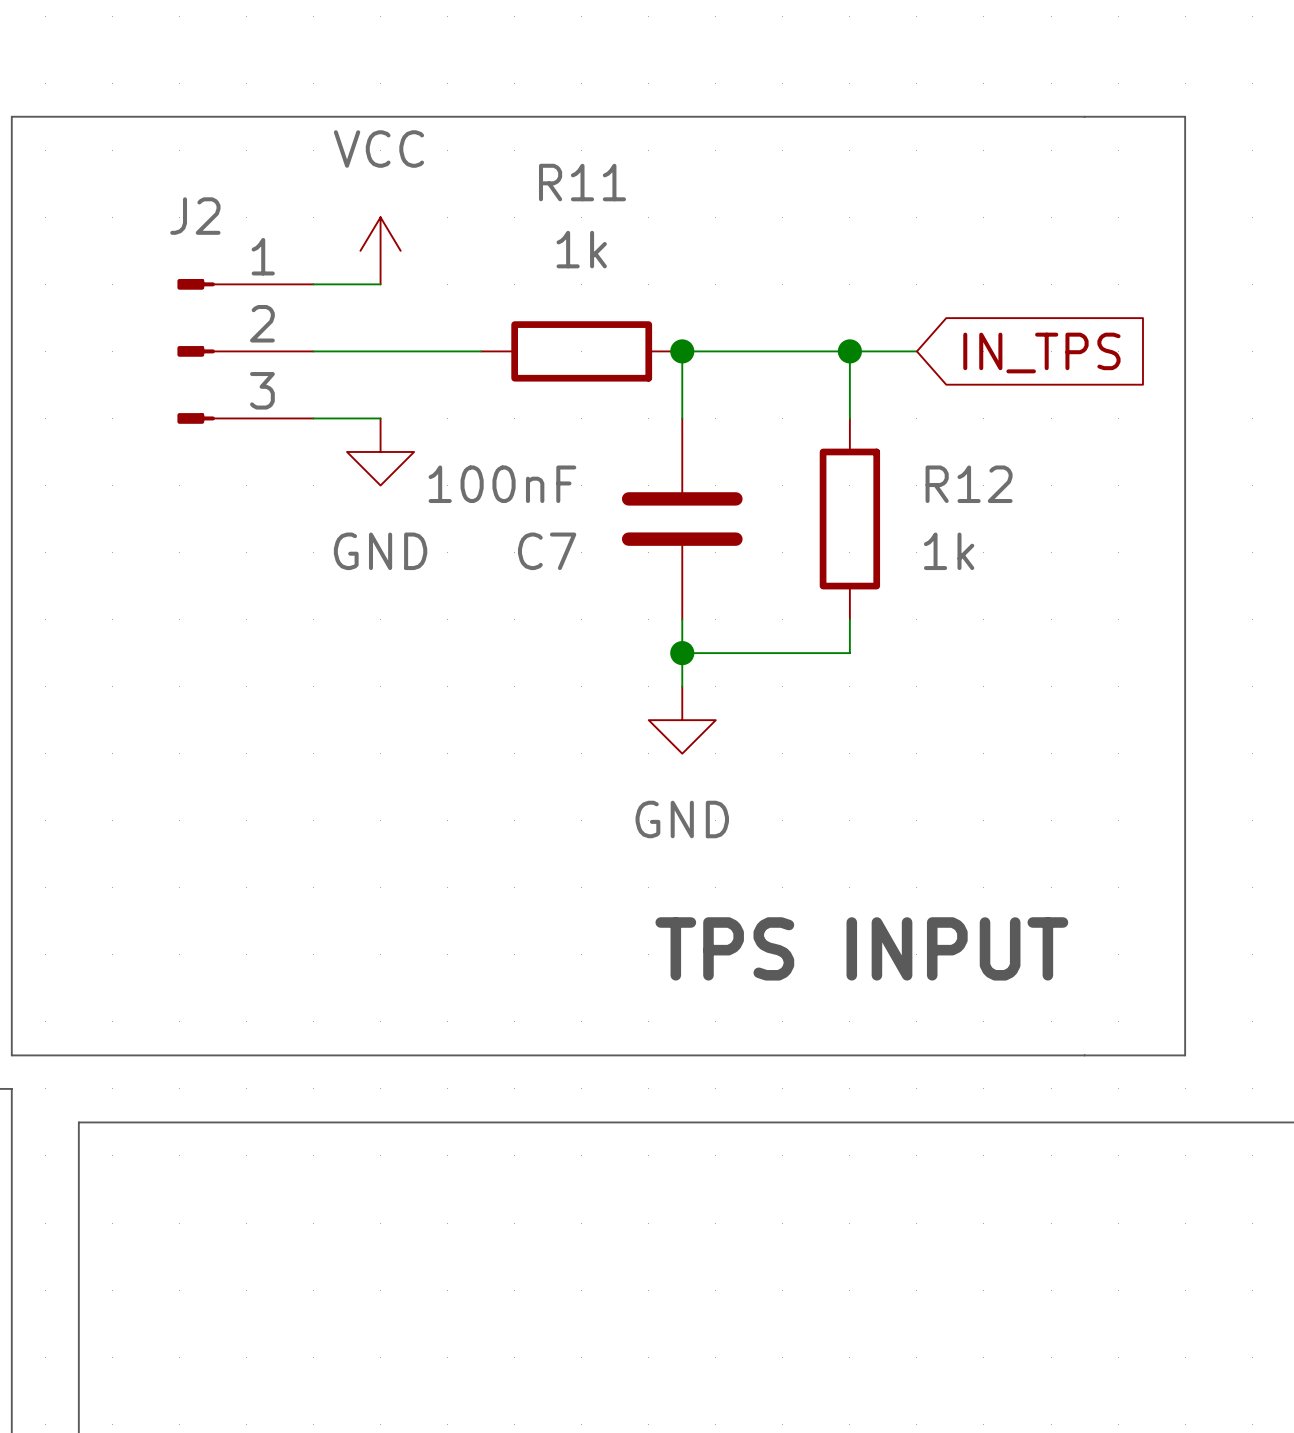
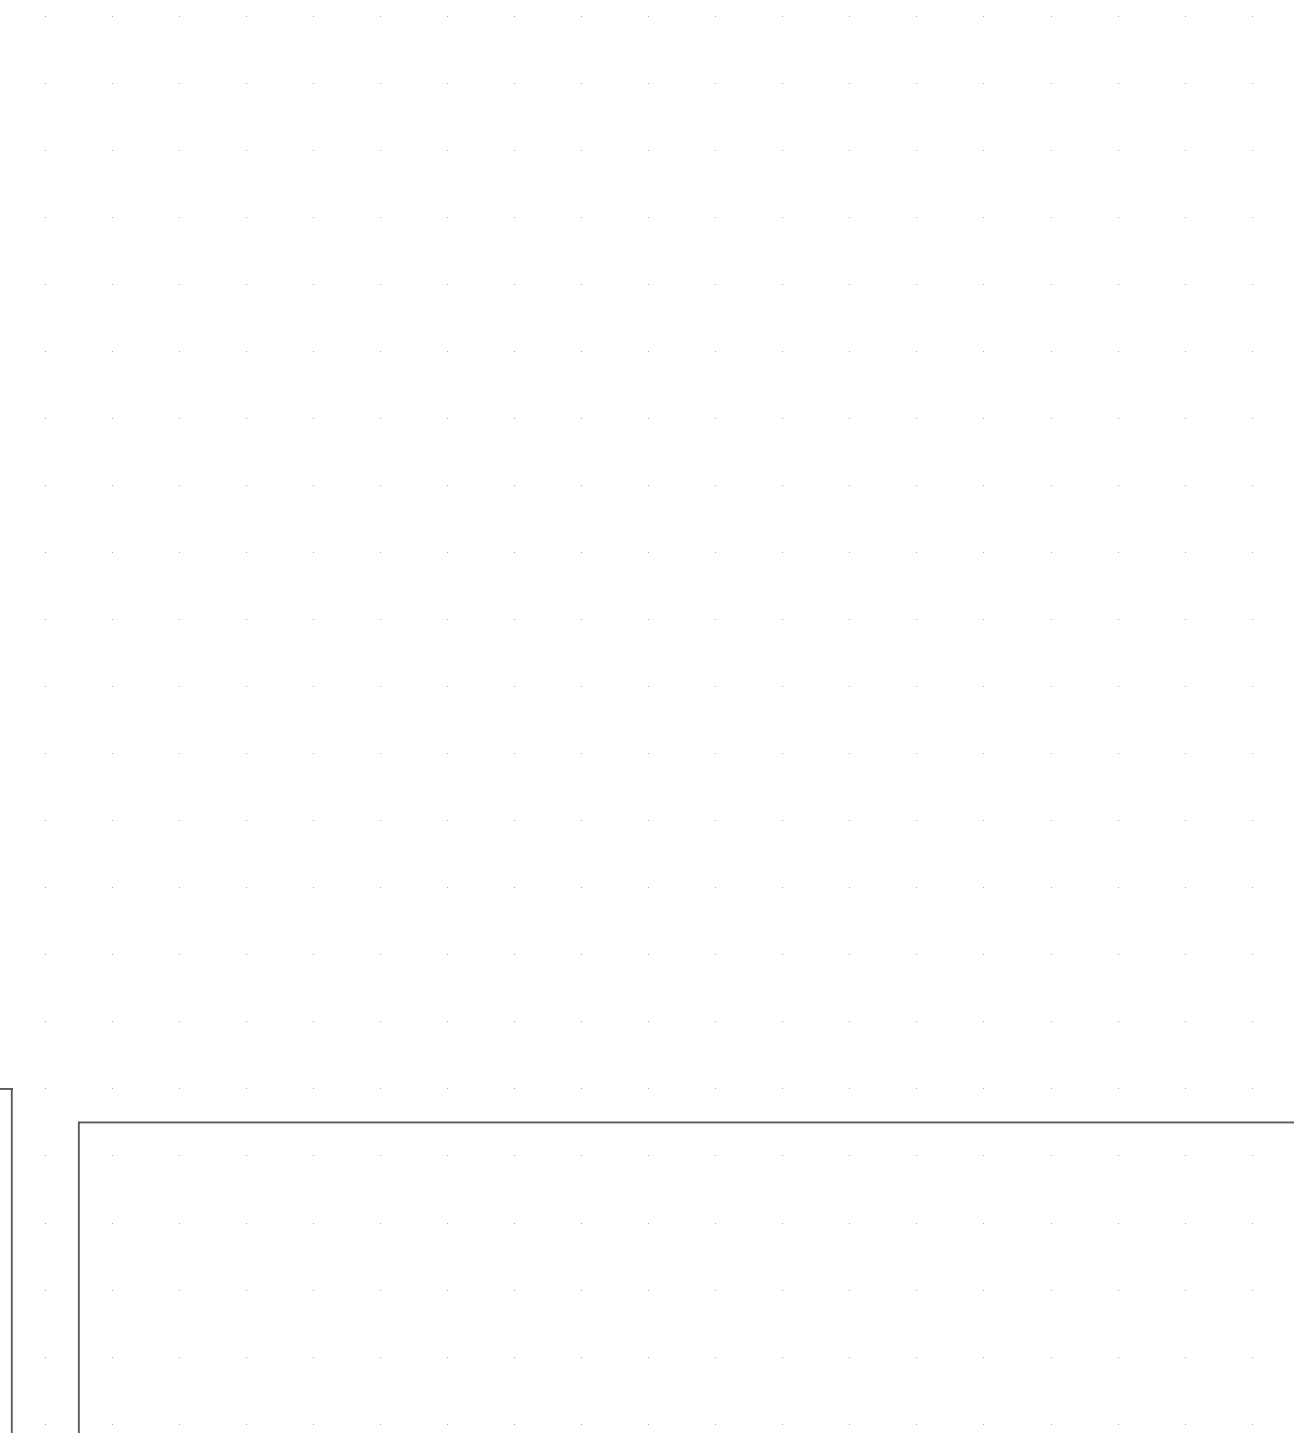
line: (11, 116) (11, 1055) (1185, 1055) (1185, 116) (11, 116) -> none
power symbol: VCC (380, 250) -> none
wire: (313, 284) (380, 284) -> none
J2: (245, 351) -> none
wire: (313, 351) (481, 351) -> none
R11: 1k (581, 351) -> none
junction: (682, 351) -> none
wire: (849, 351) (849, 418) -> none
junction: (849, 351) -> none
wire: (916, 351) (682, 351) (682, 418) -> none
global label: IN_TPS (1041, 353) -> none
wire: (313, 418) (380, 418) -> none
power symbol: GND (380, 451) -> none
C7: 100nF (682, 519) -> none
R12: 1k (849, 519) -> none
wire: (682, 619) (682, 686) -> none
wire: (849, 619) (849, 653) (682, 653) -> none
junction: (682, 653) -> none
power symbol: GND (682, 720) -> none
text: TPS INPUT (861, 948) -> none

